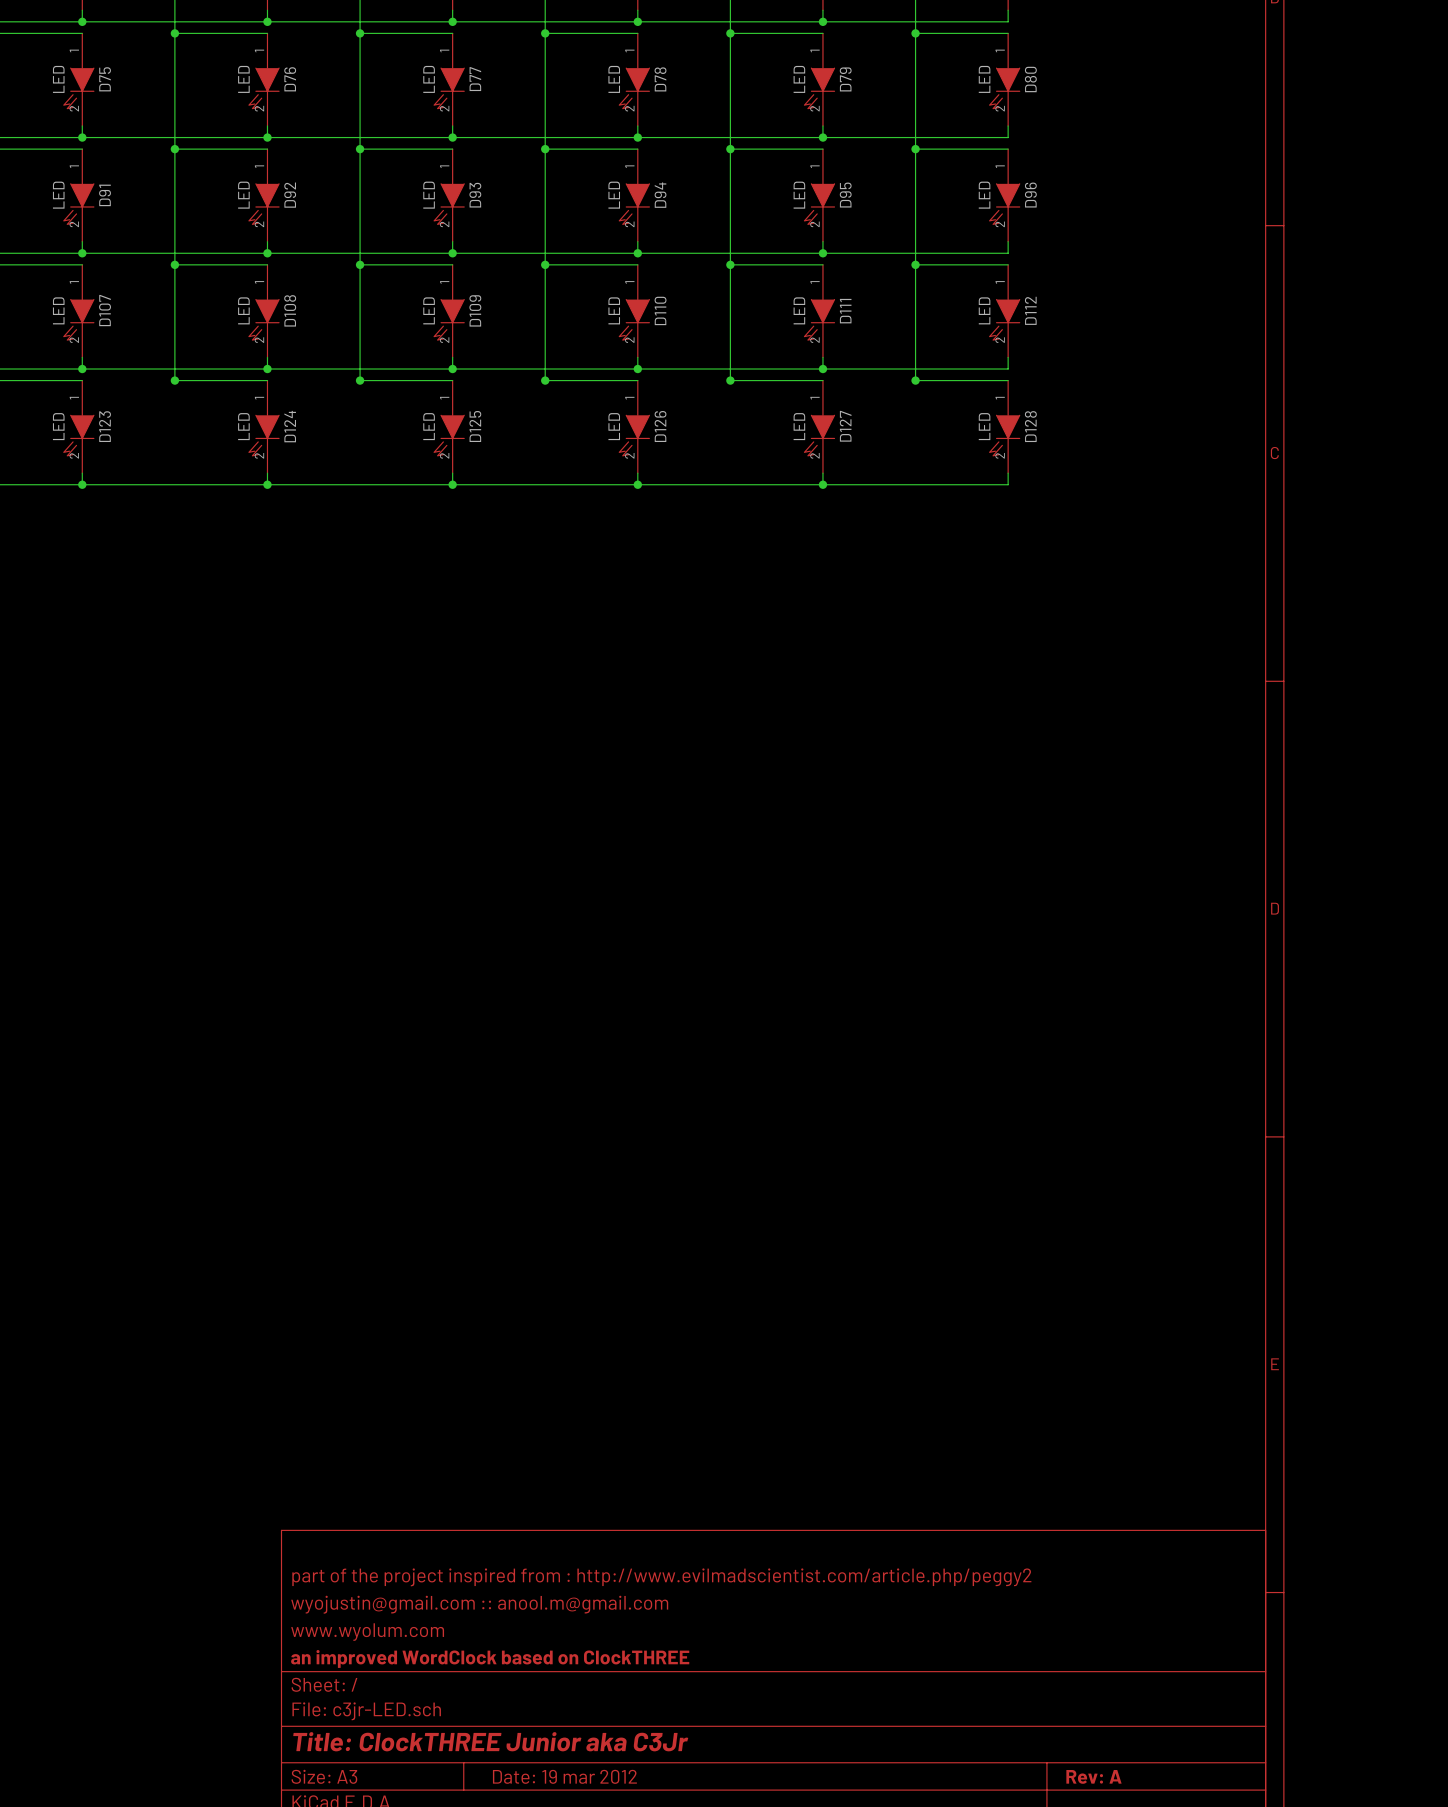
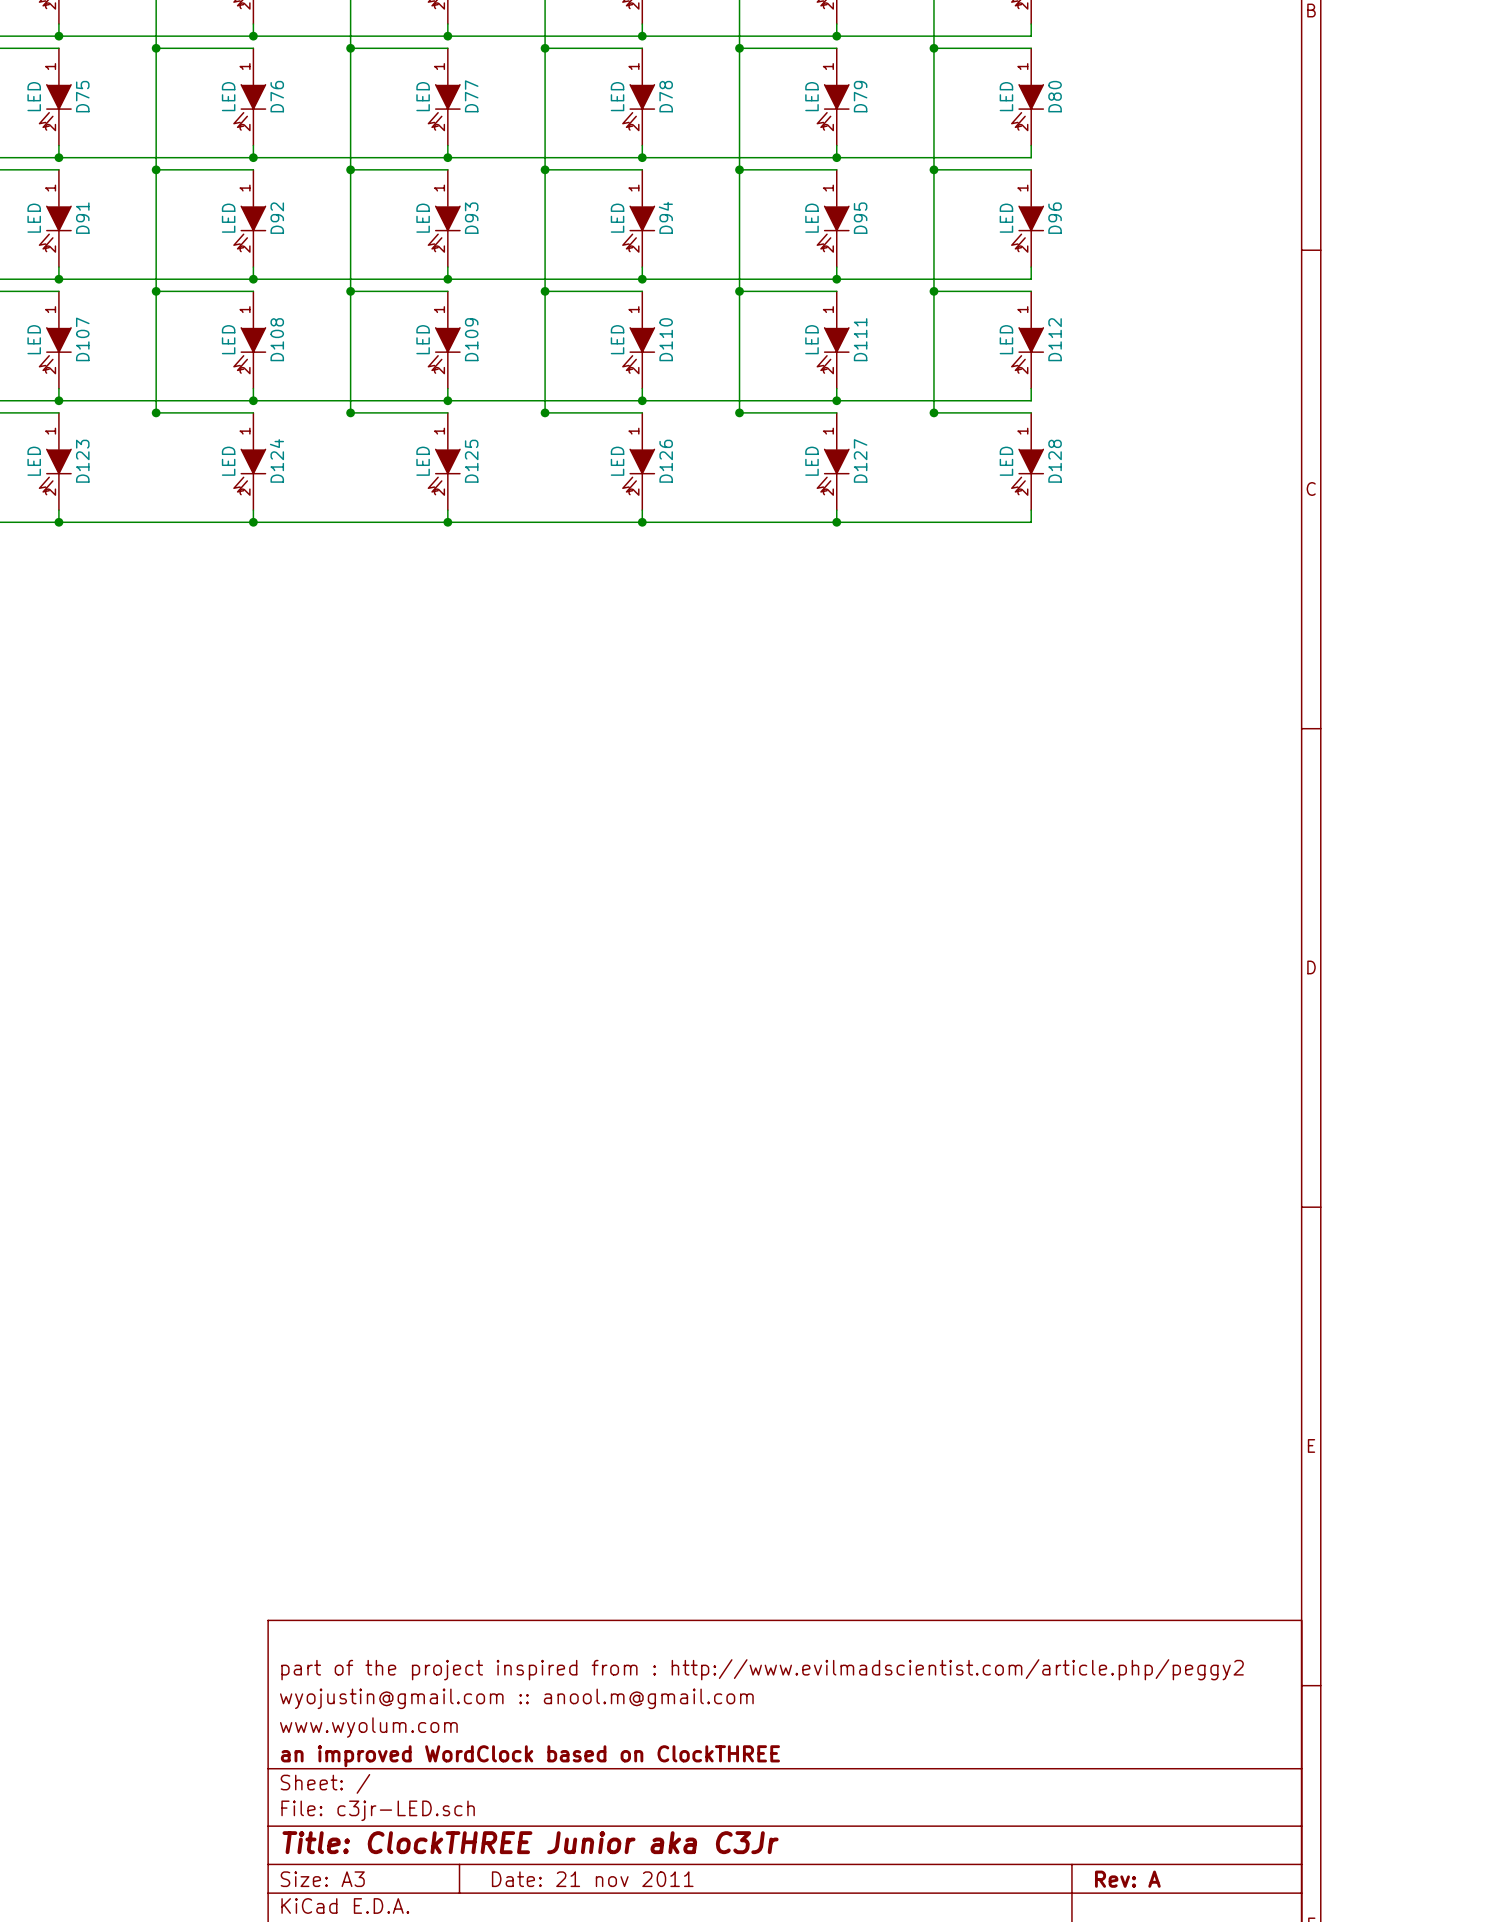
title block: Date: 19 mar 2012 (564, 1776) -> Date: 21 nov 2011 (592, 1879)

